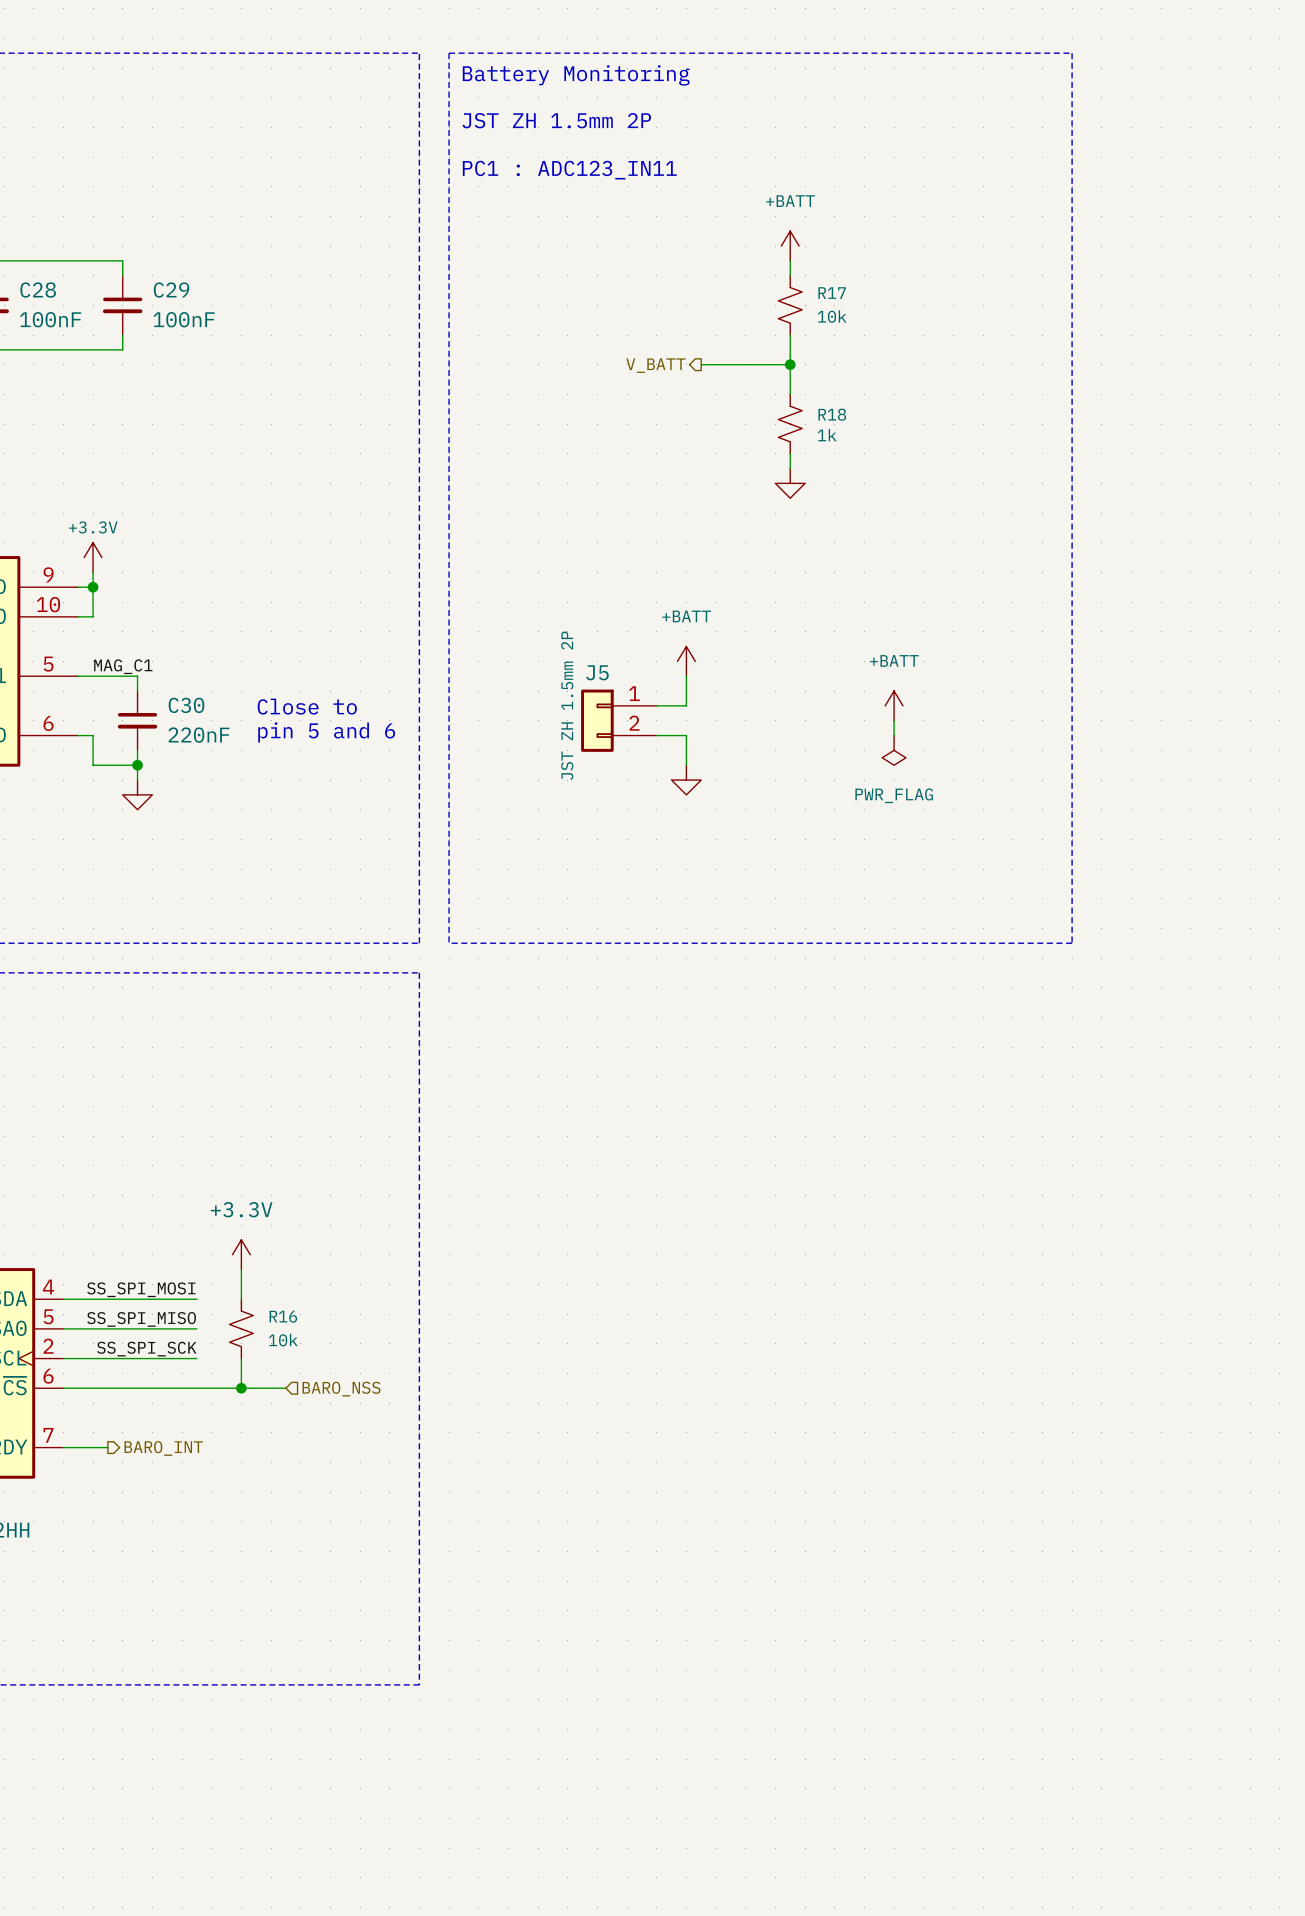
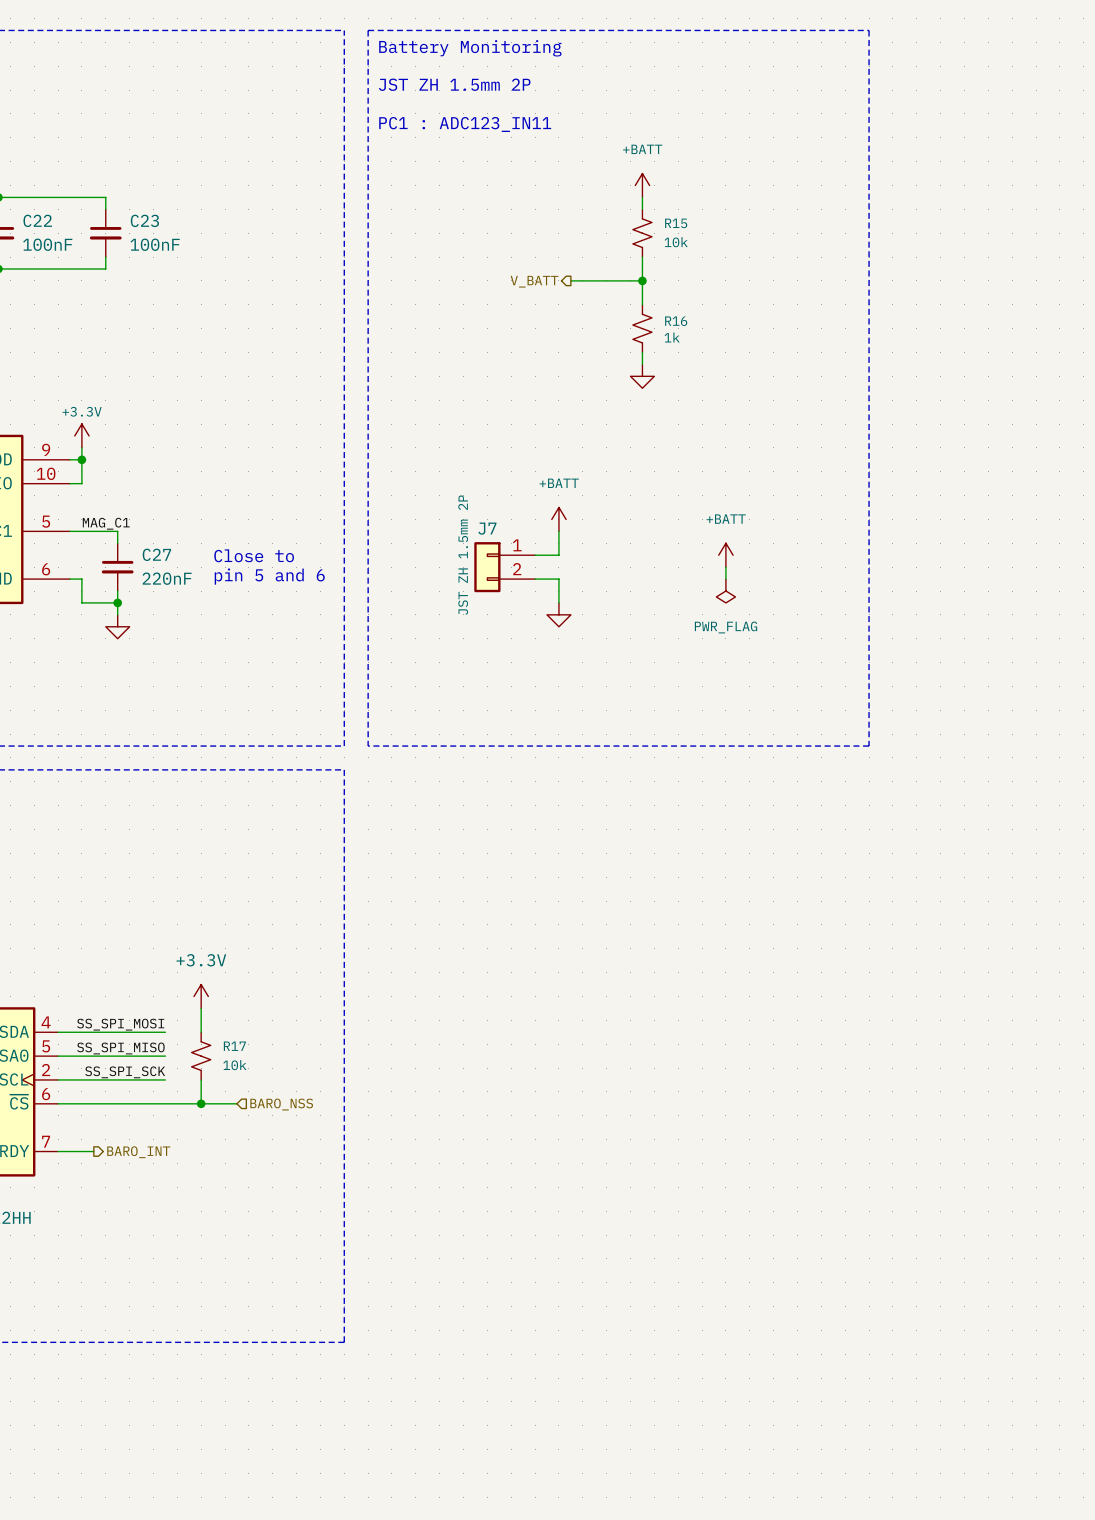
C28 name: C28 (38, 290) -> C22 (37, 220)
C29 name: C29 (171, 290) -> C23 (144, 220)
R17 name: R17 (832, 293) -> R15 (676, 223)
R18 name: R18 (832, 414) -> R16 (676, 321)
J5 name: J5 (597, 672) -> J7 (487, 528)
C30 name: C30 (186, 705) -> C27 (156, 554)
R16 name: R16 (283, 1316) -> R17 (234, 1046)

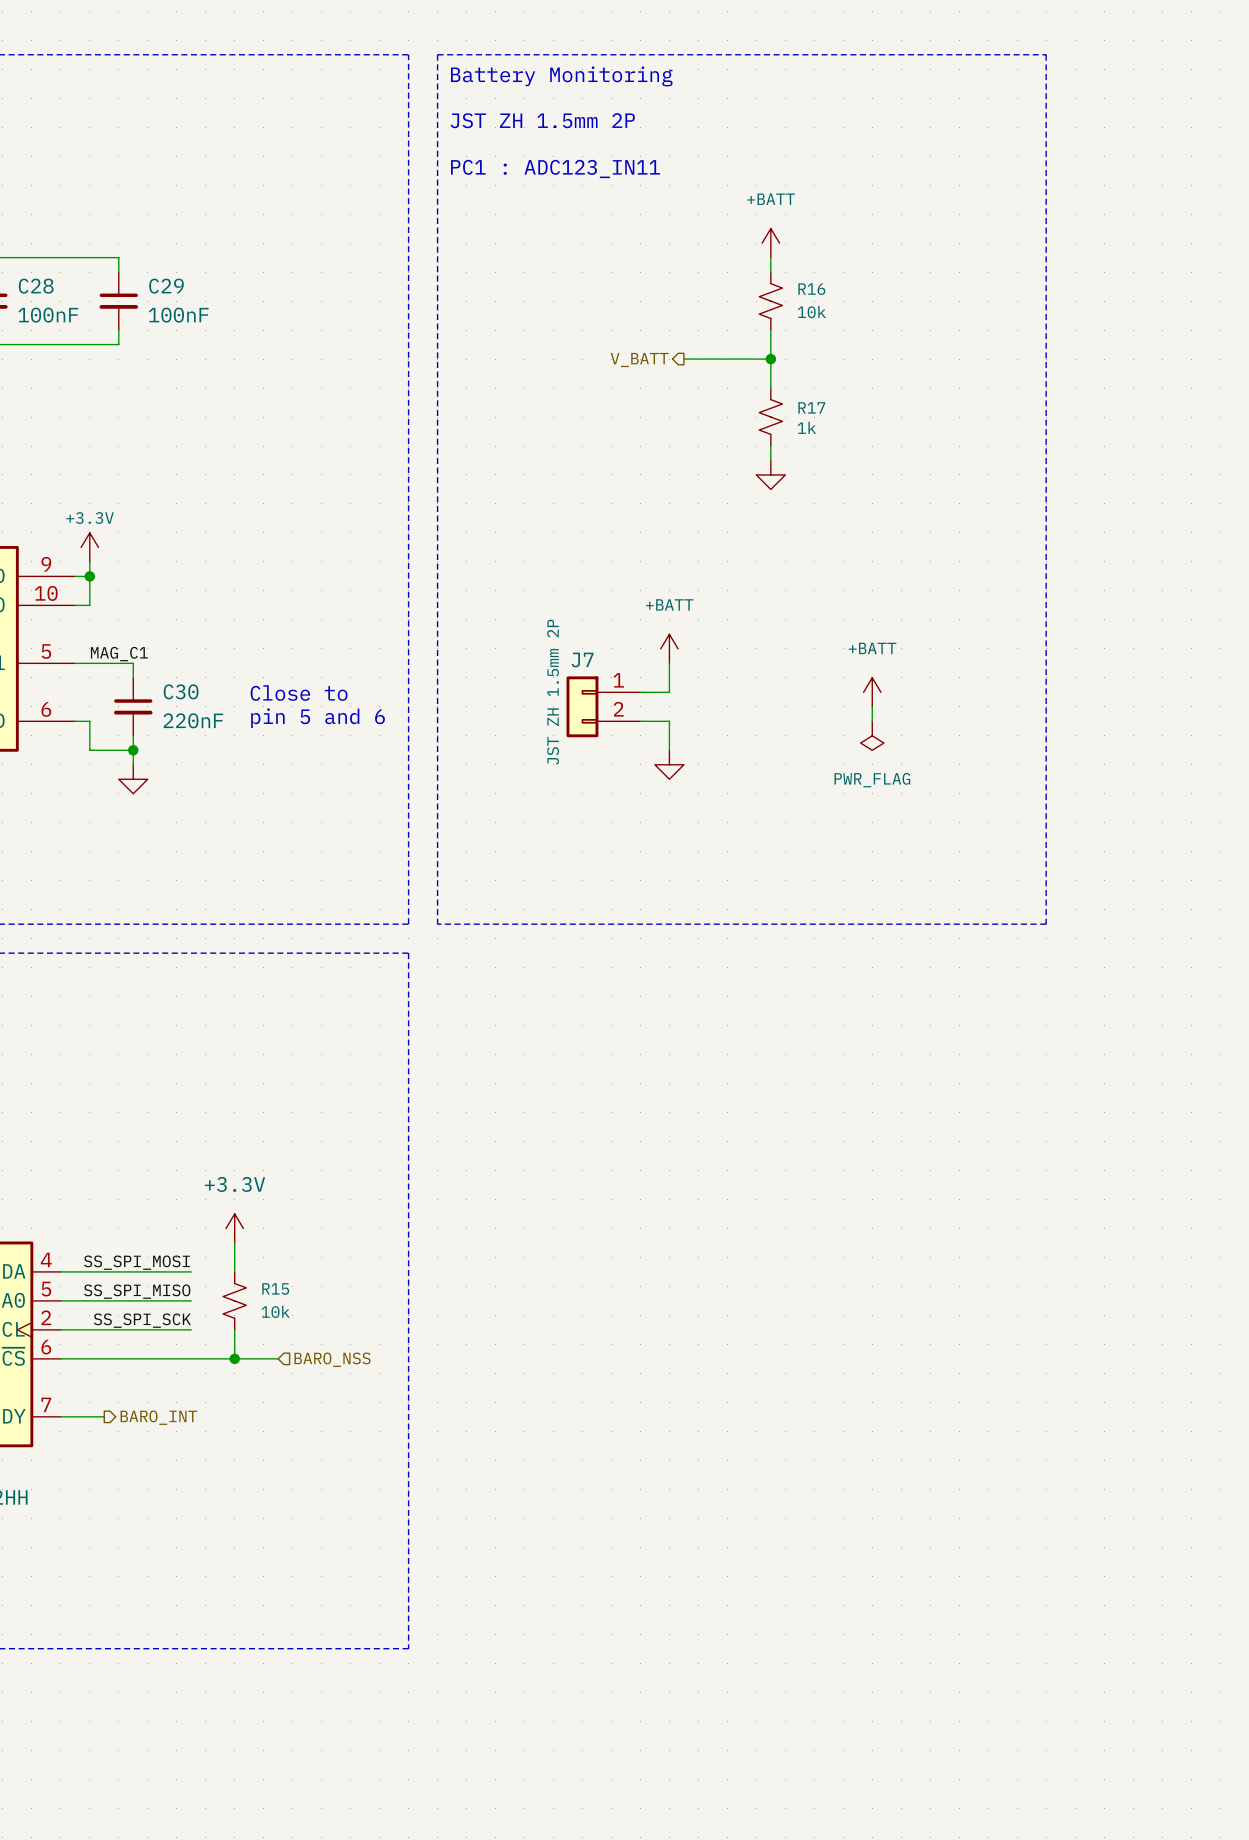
C22 name: C22 (37, 220) -> C28 (36, 286)
C23 name: C23 (144, 220) -> C29 (166, 286)
R15 name: R15 (676, 223) -> R16 (811, 289)
R16 name: R16 (676, 321) -> R17 (811, 407)
C27 name: C27 (156, 554) -> C30 (181, 691)
R17 name: R17 (234, 1046) -> R15 (275, 1289)

